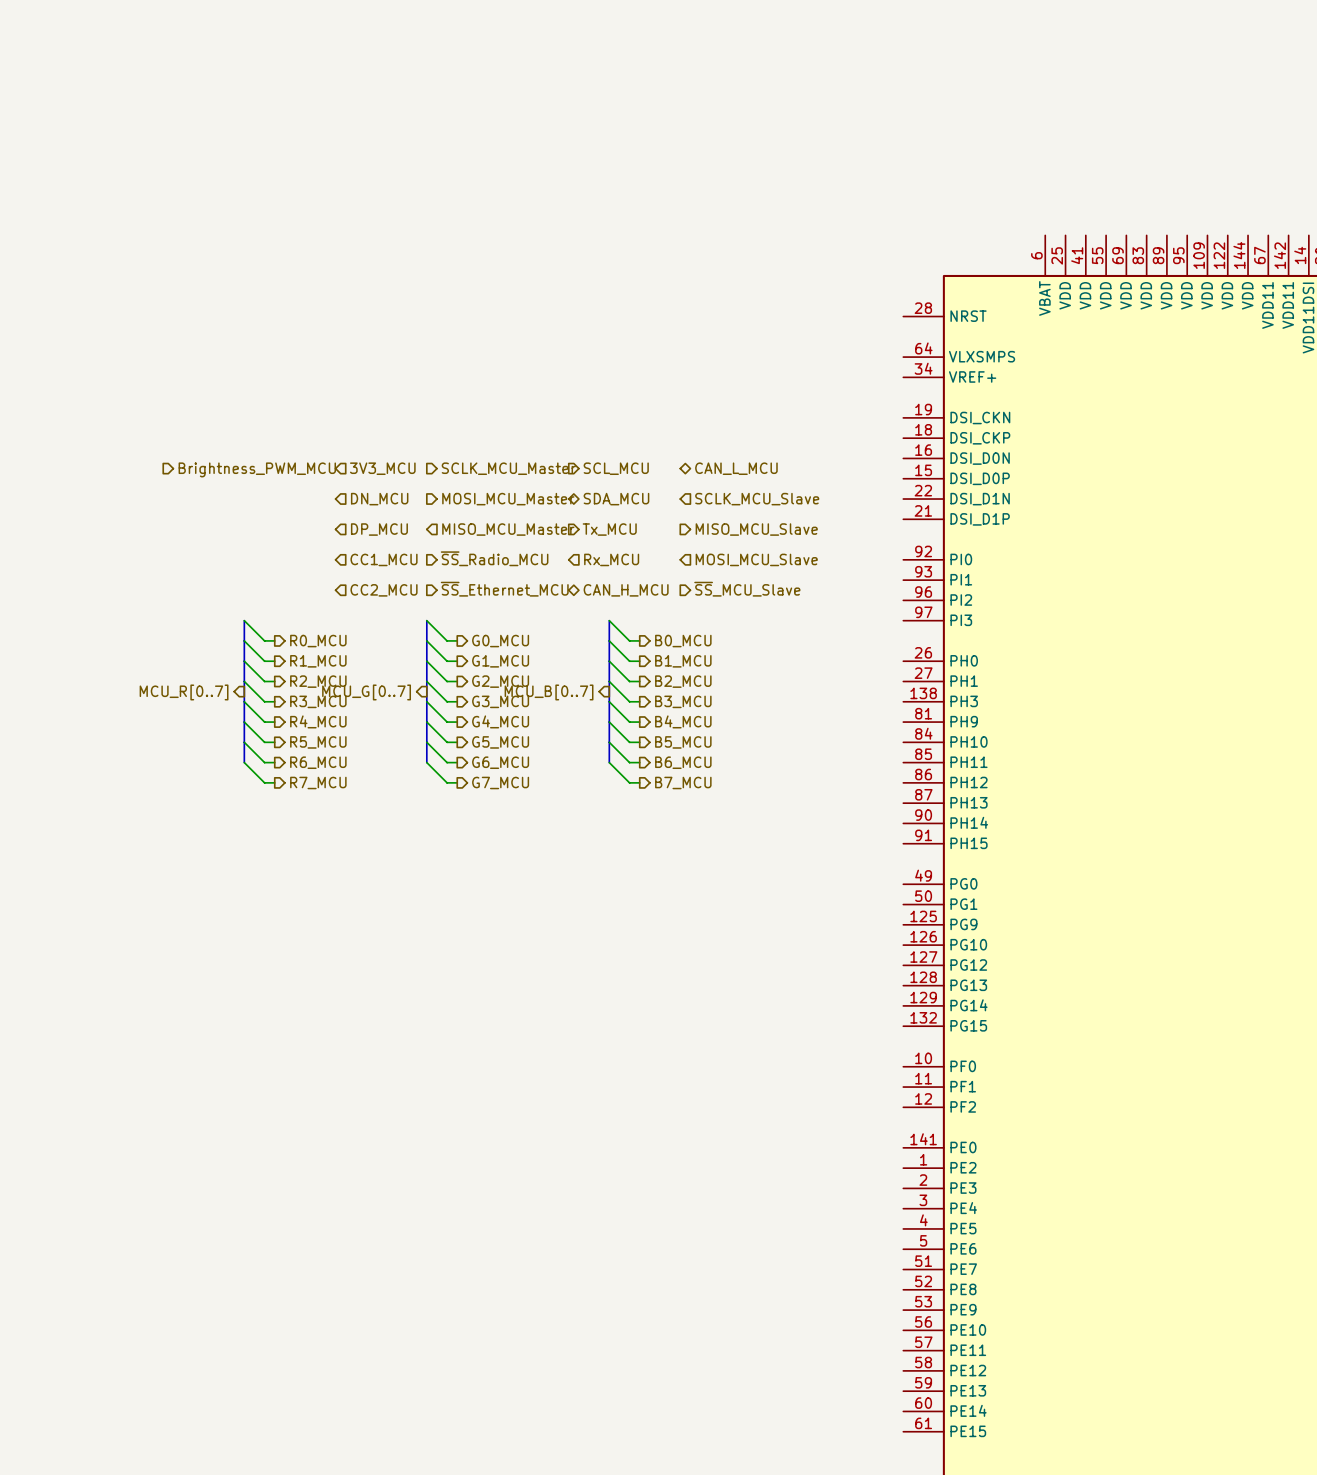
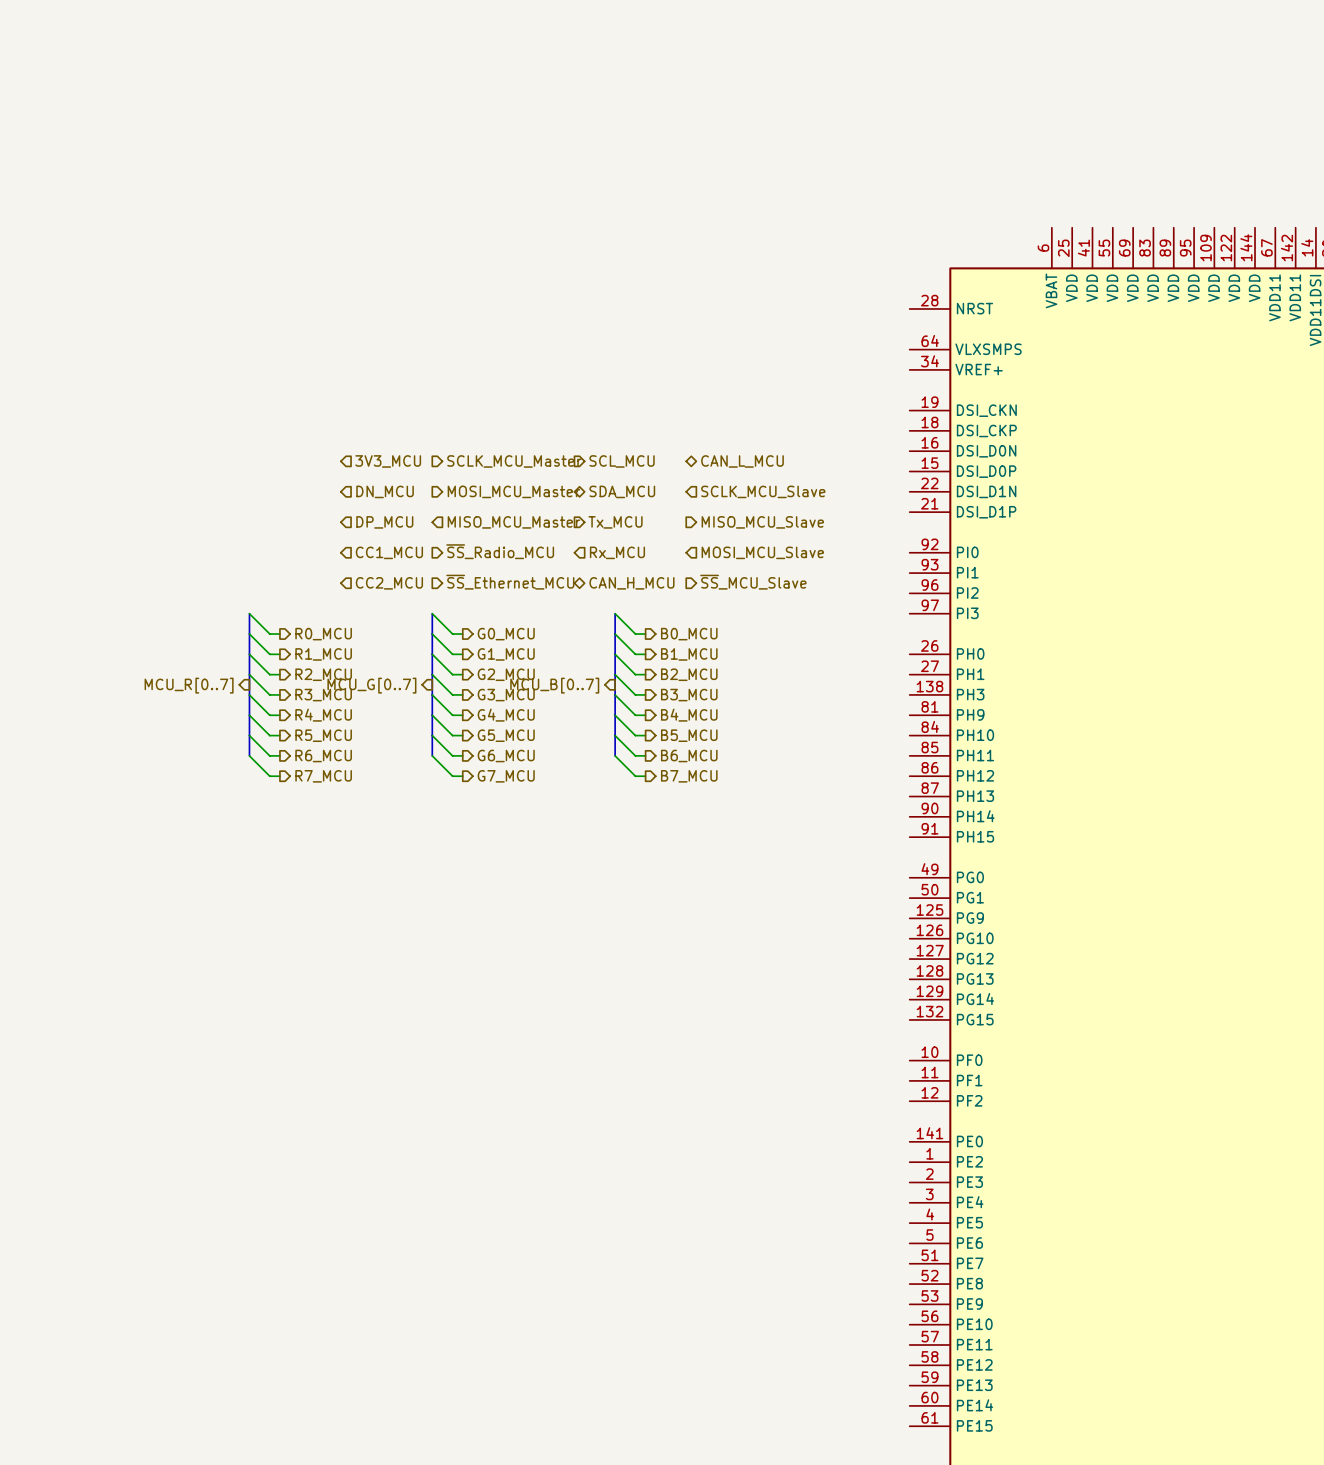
hierarchical label: Brightness_PWM_MCU (257, 469) -> none

